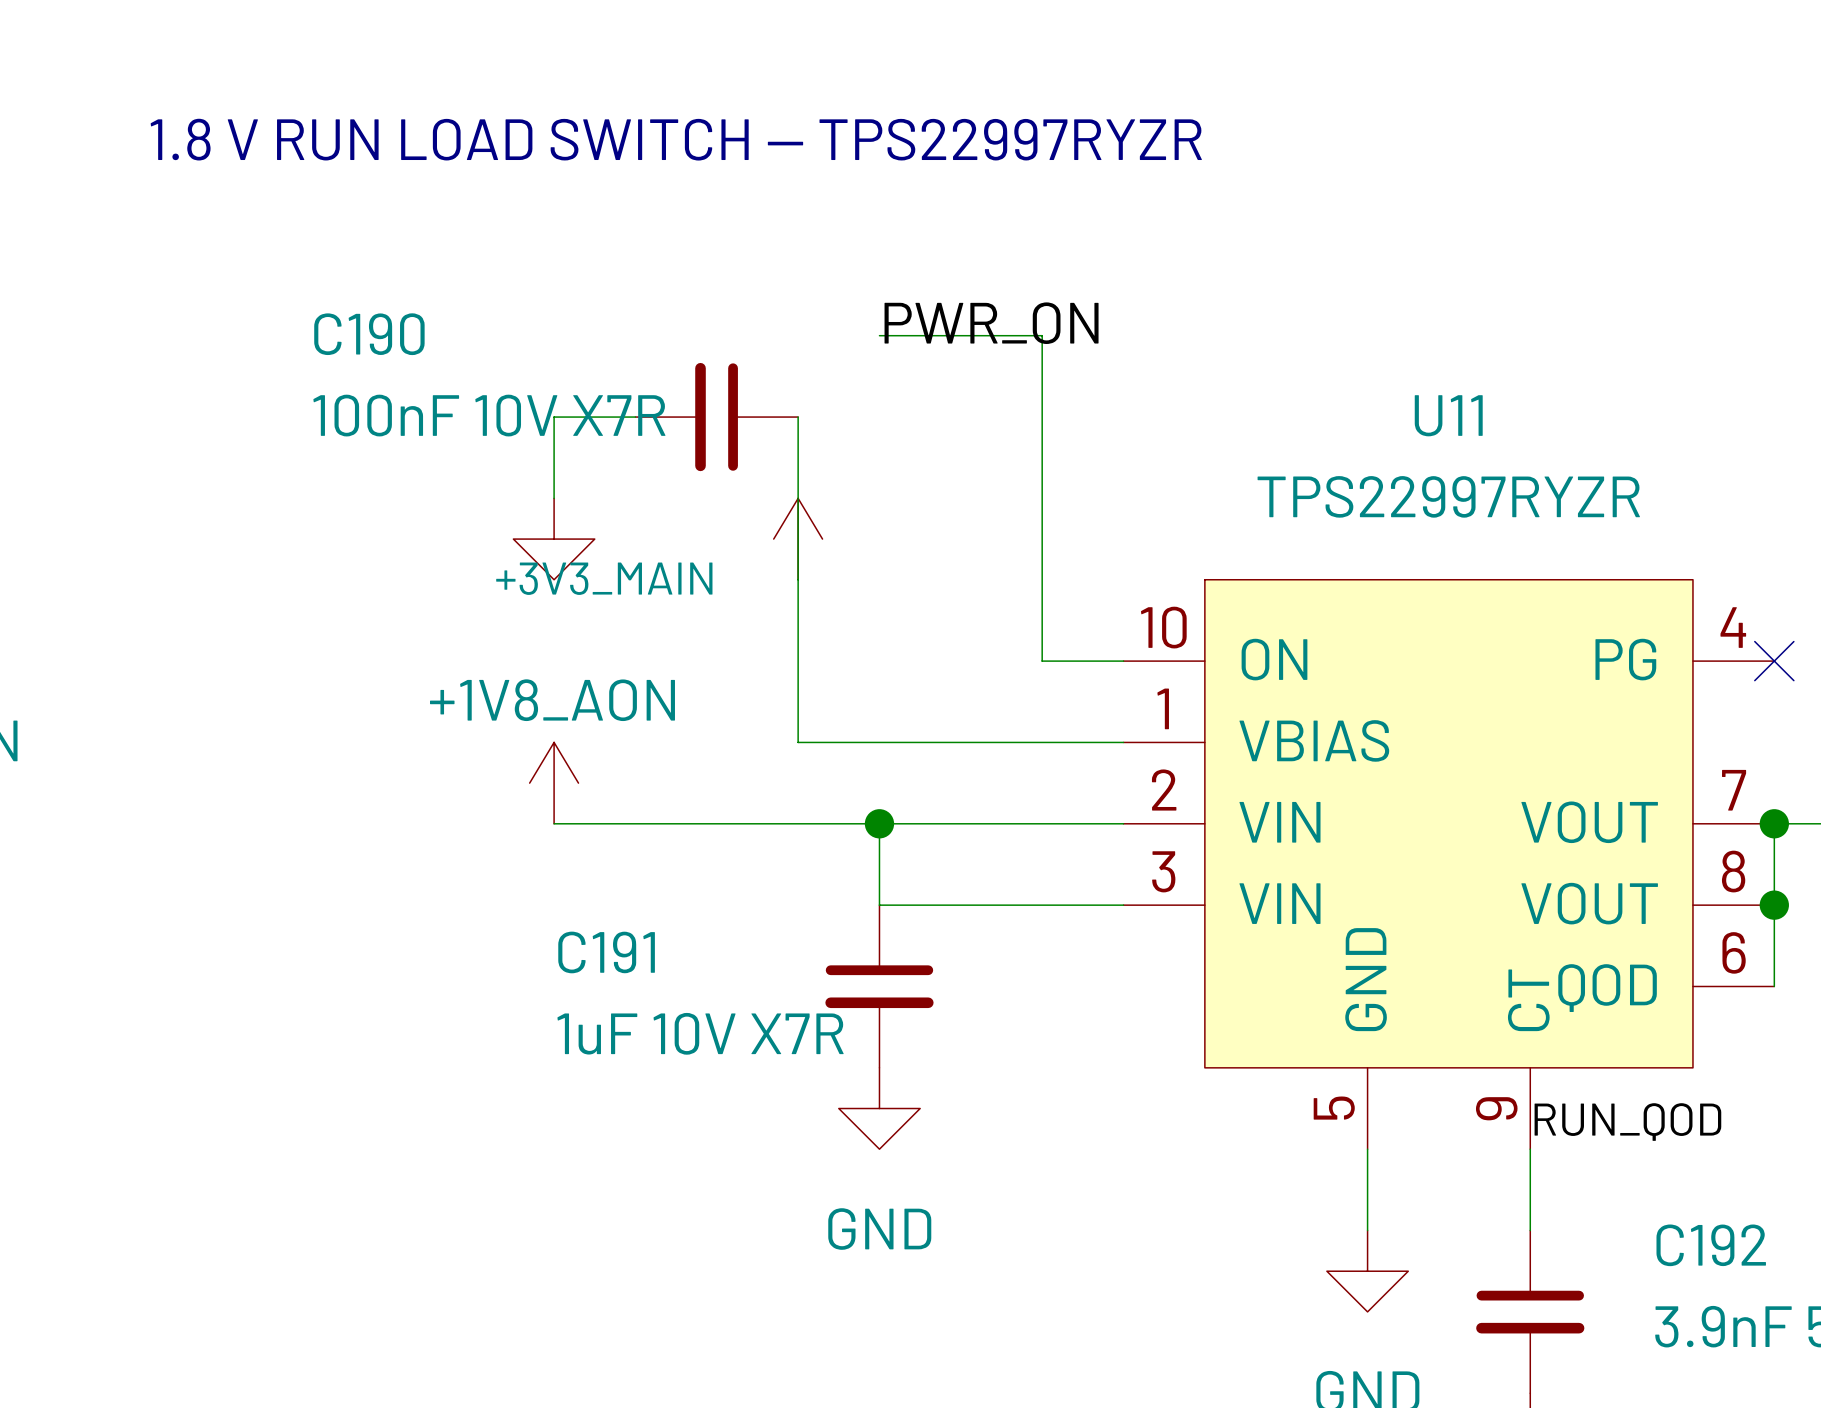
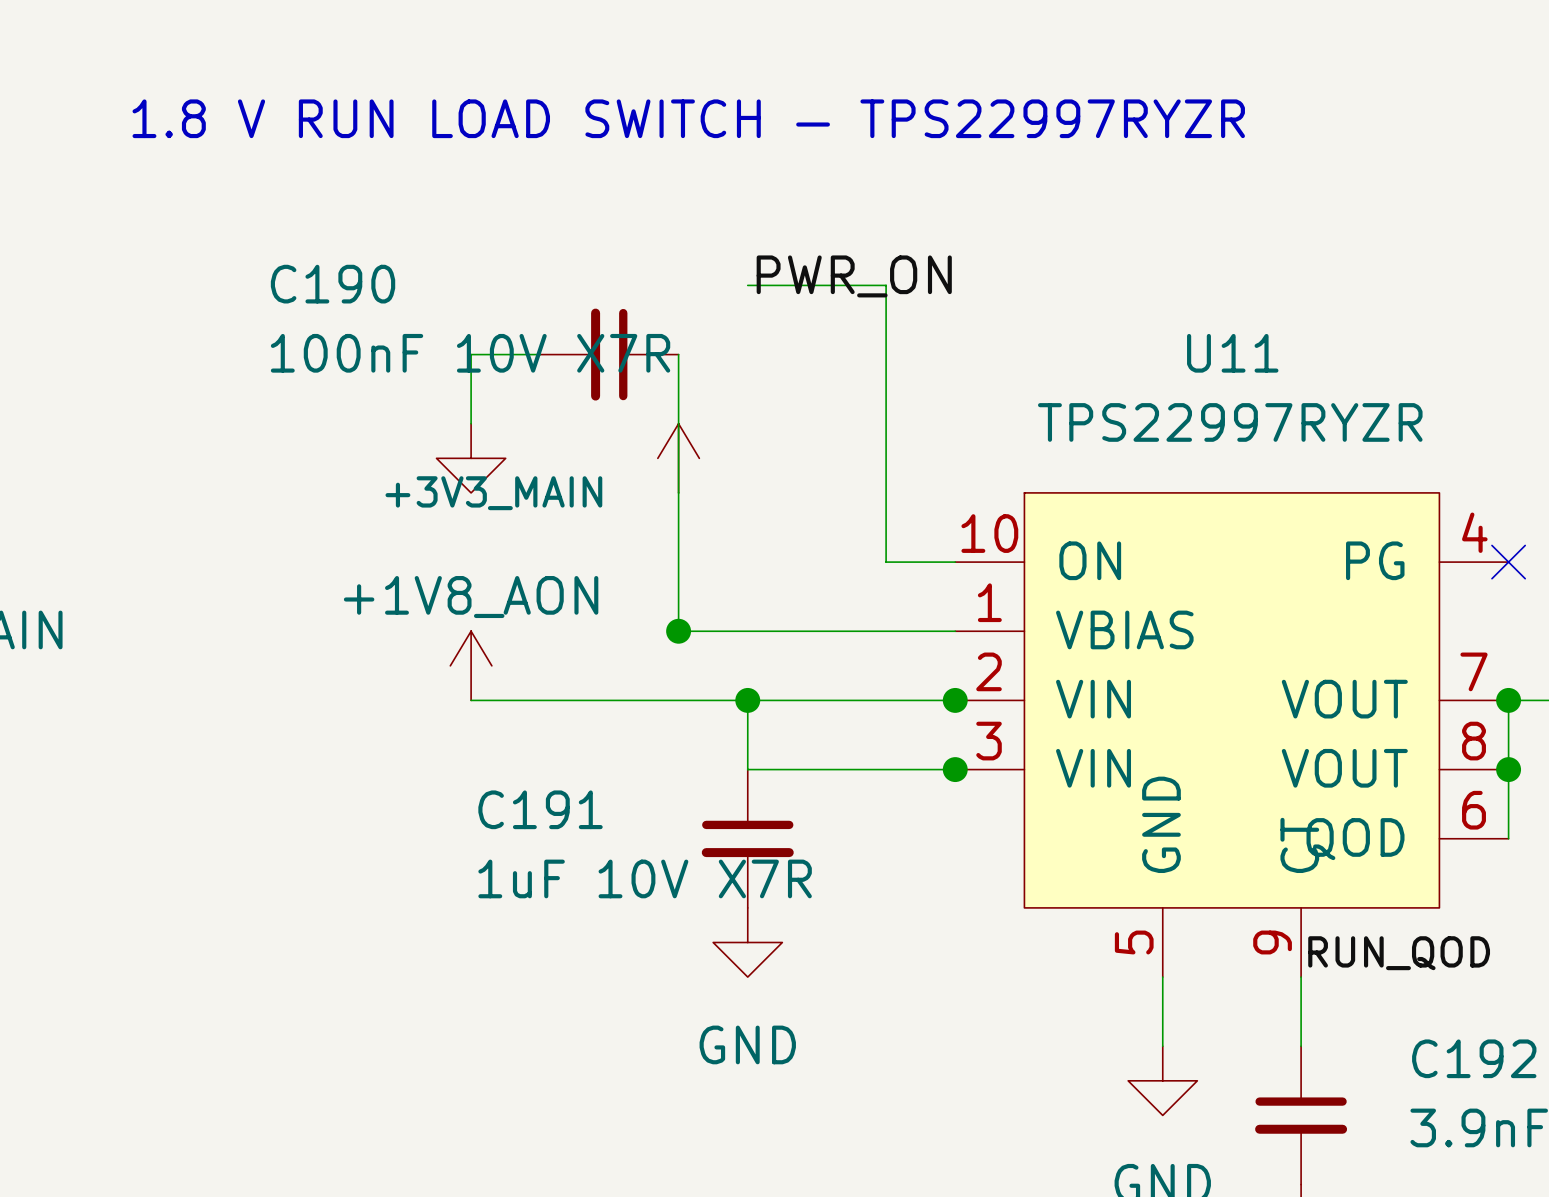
junction: none -> (678, 631)
junction: none -> (955, 700)
junction: none -> (955, 769)

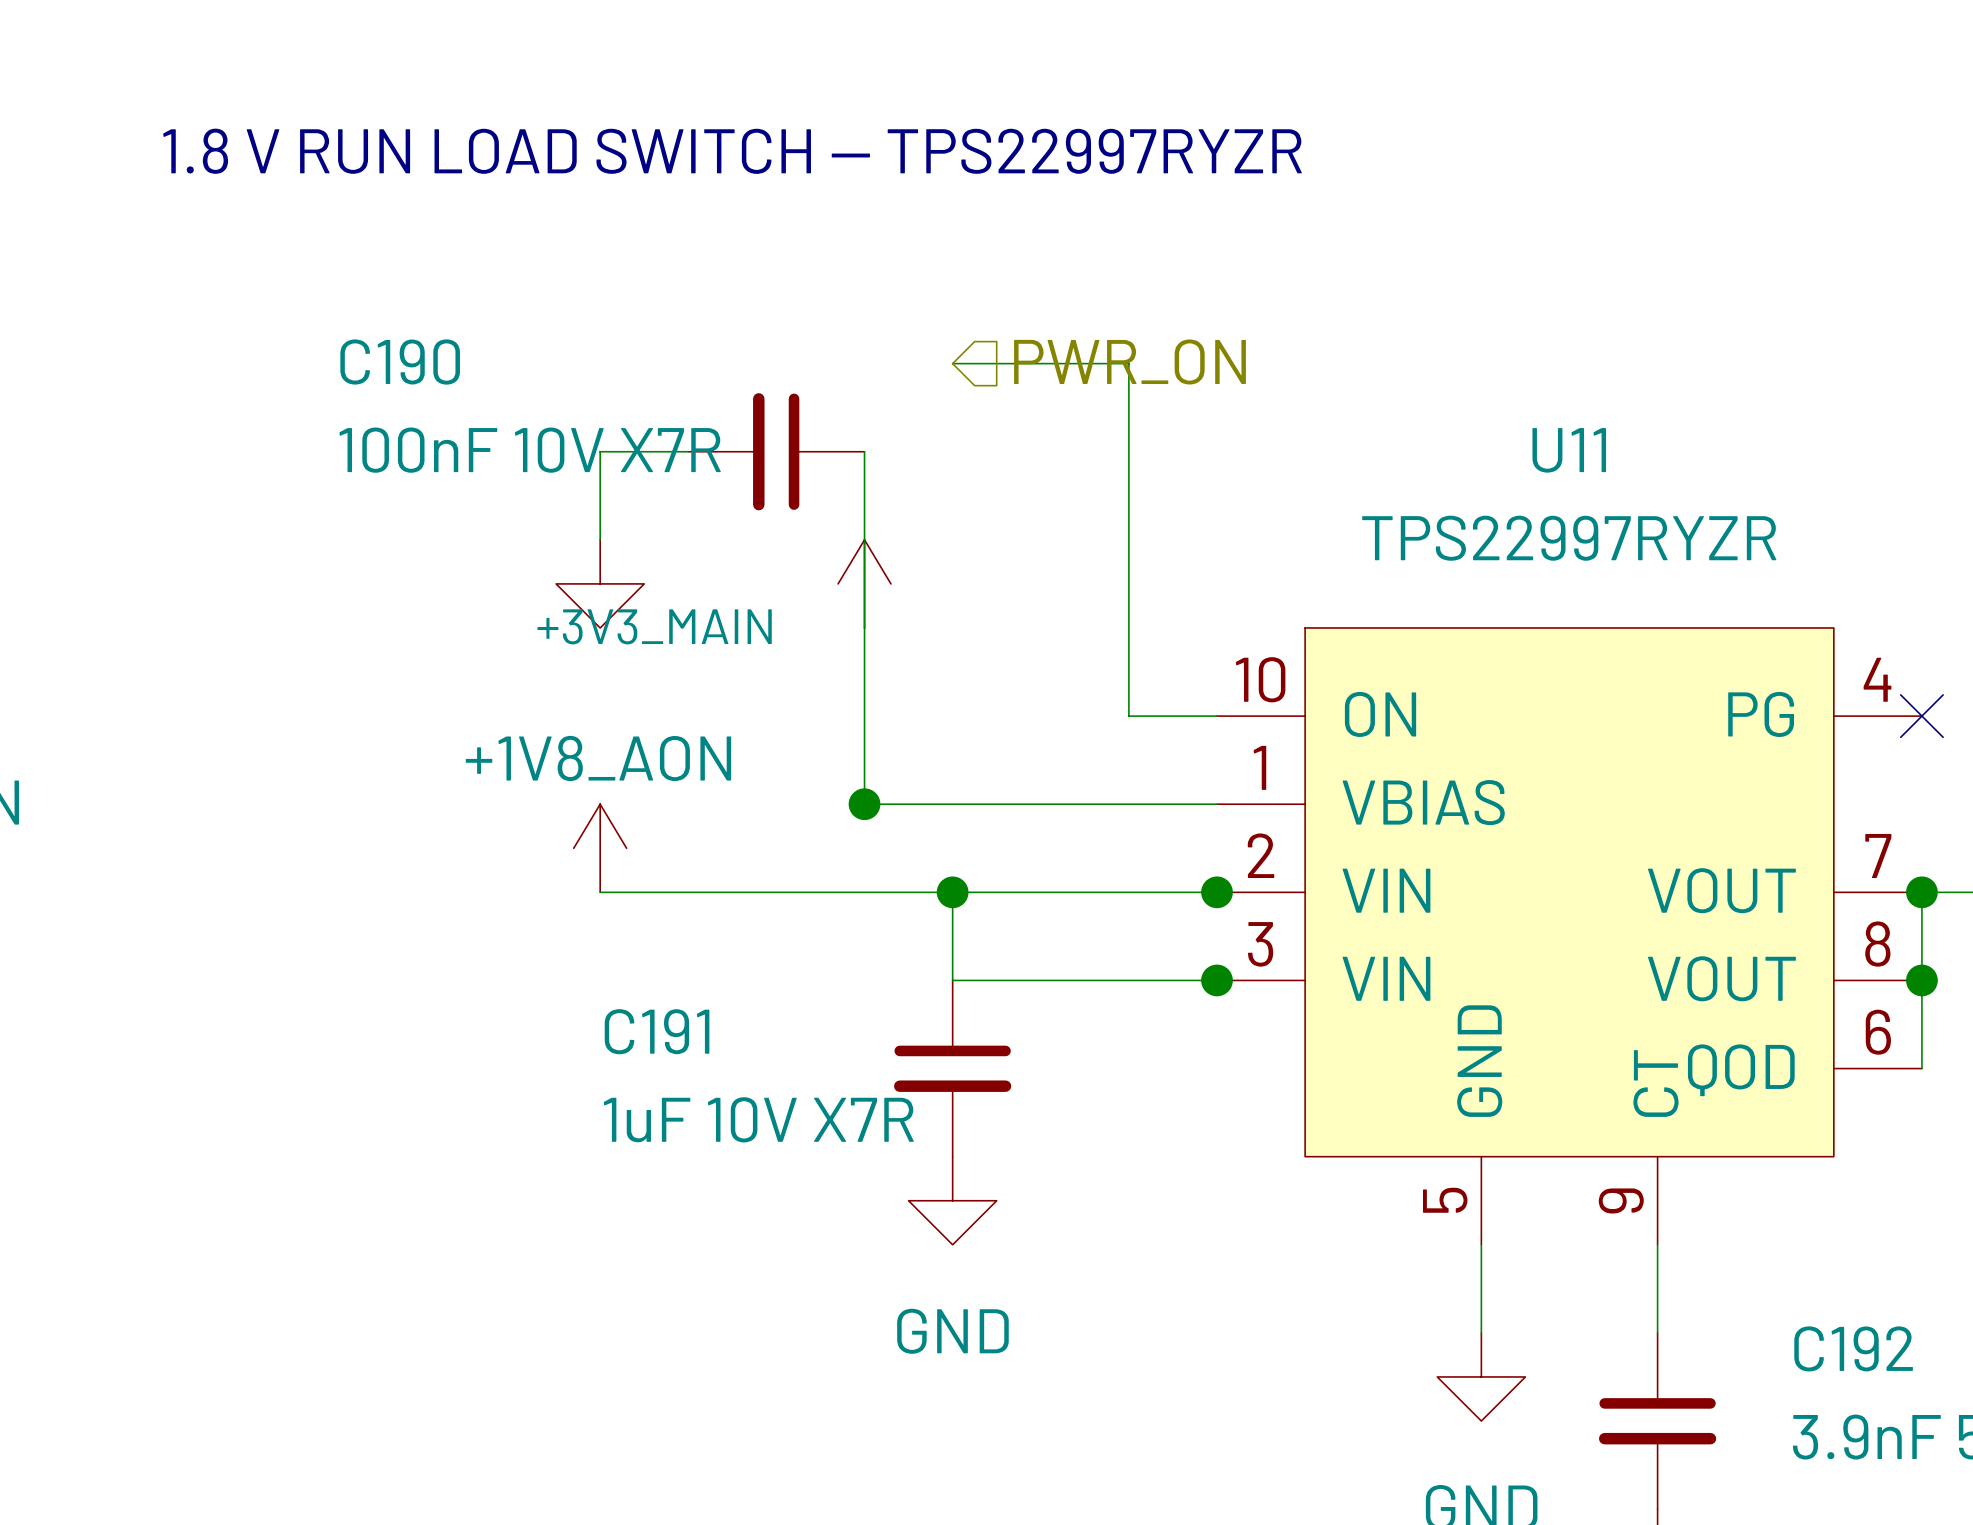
label: PWR_ON (854, 276) -> none
hierarchical label: none -> PWR_ON (1129, 361)
label: RUN_QOD (1399, 953) -> none

